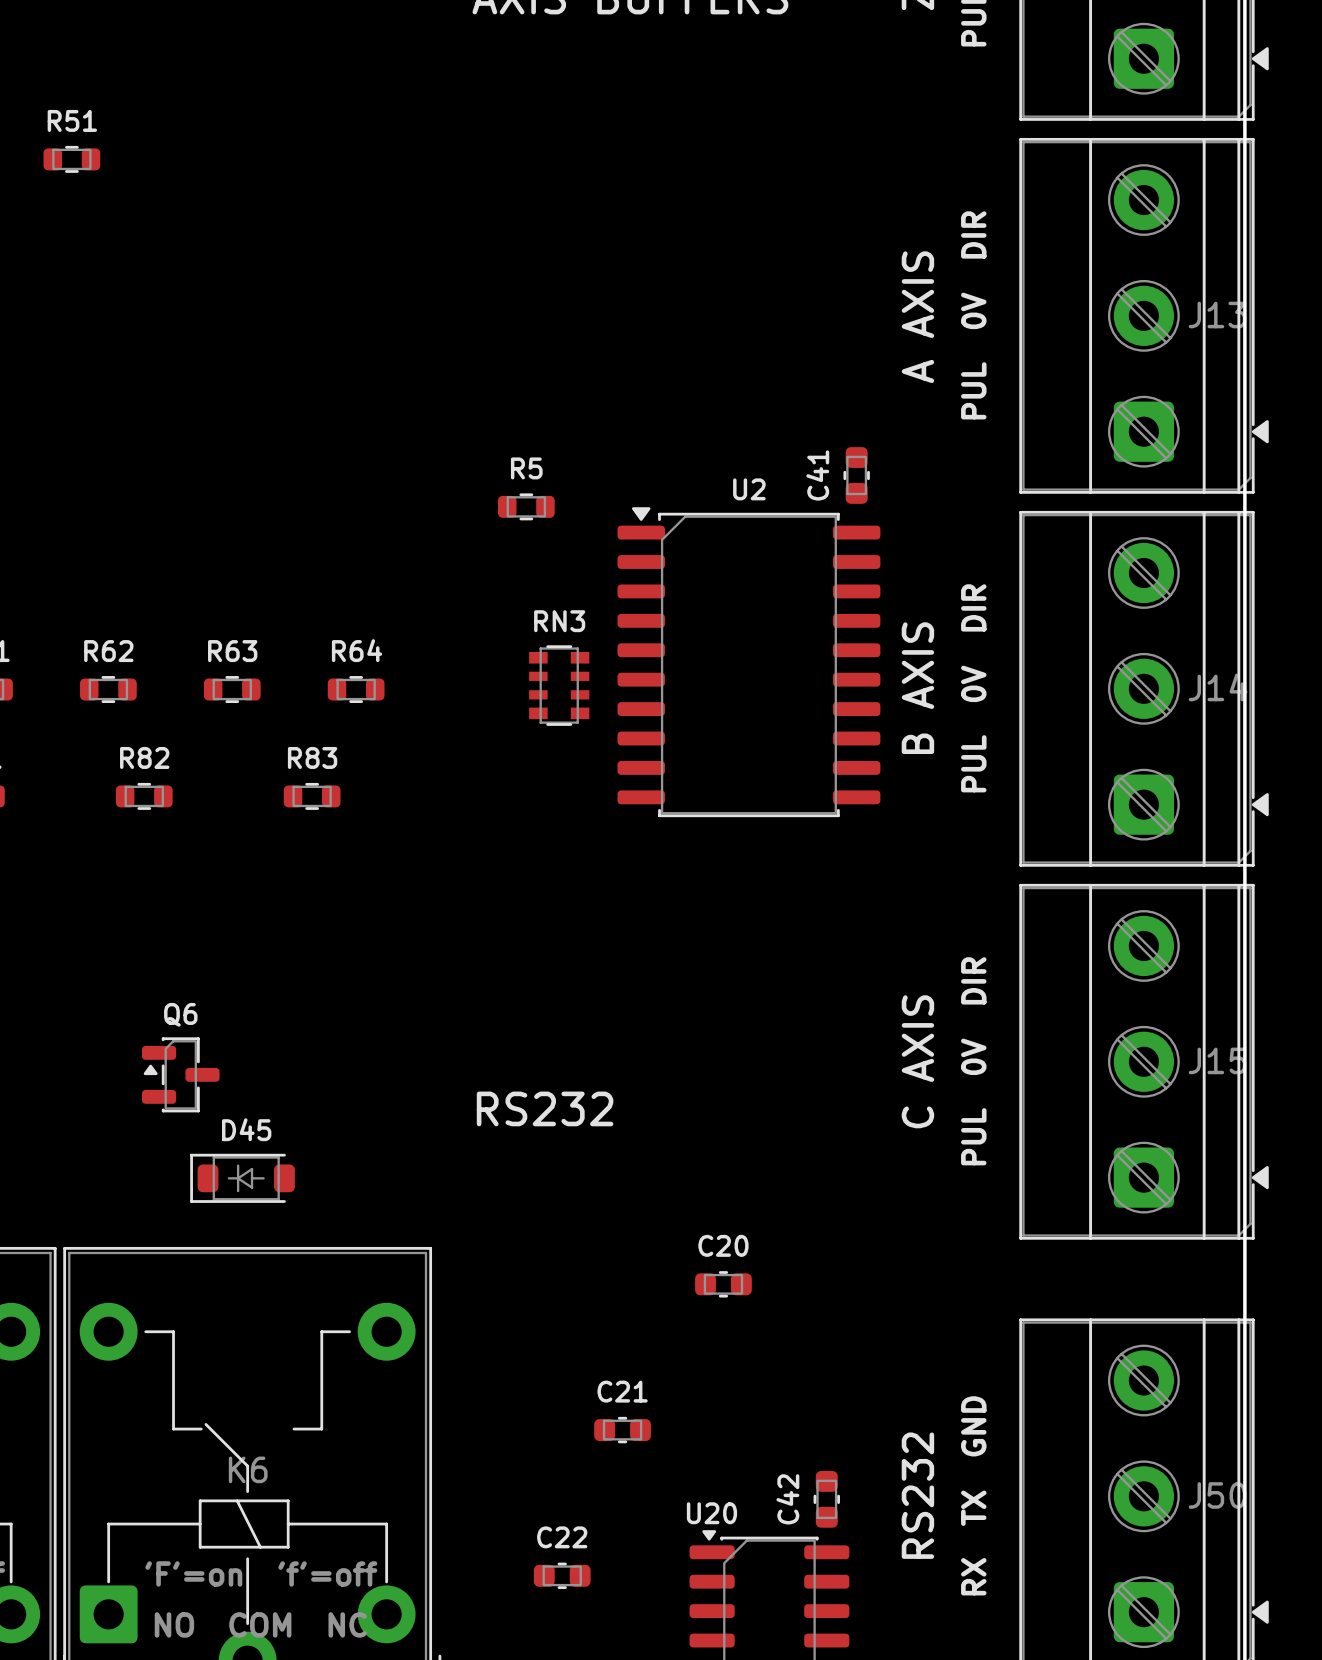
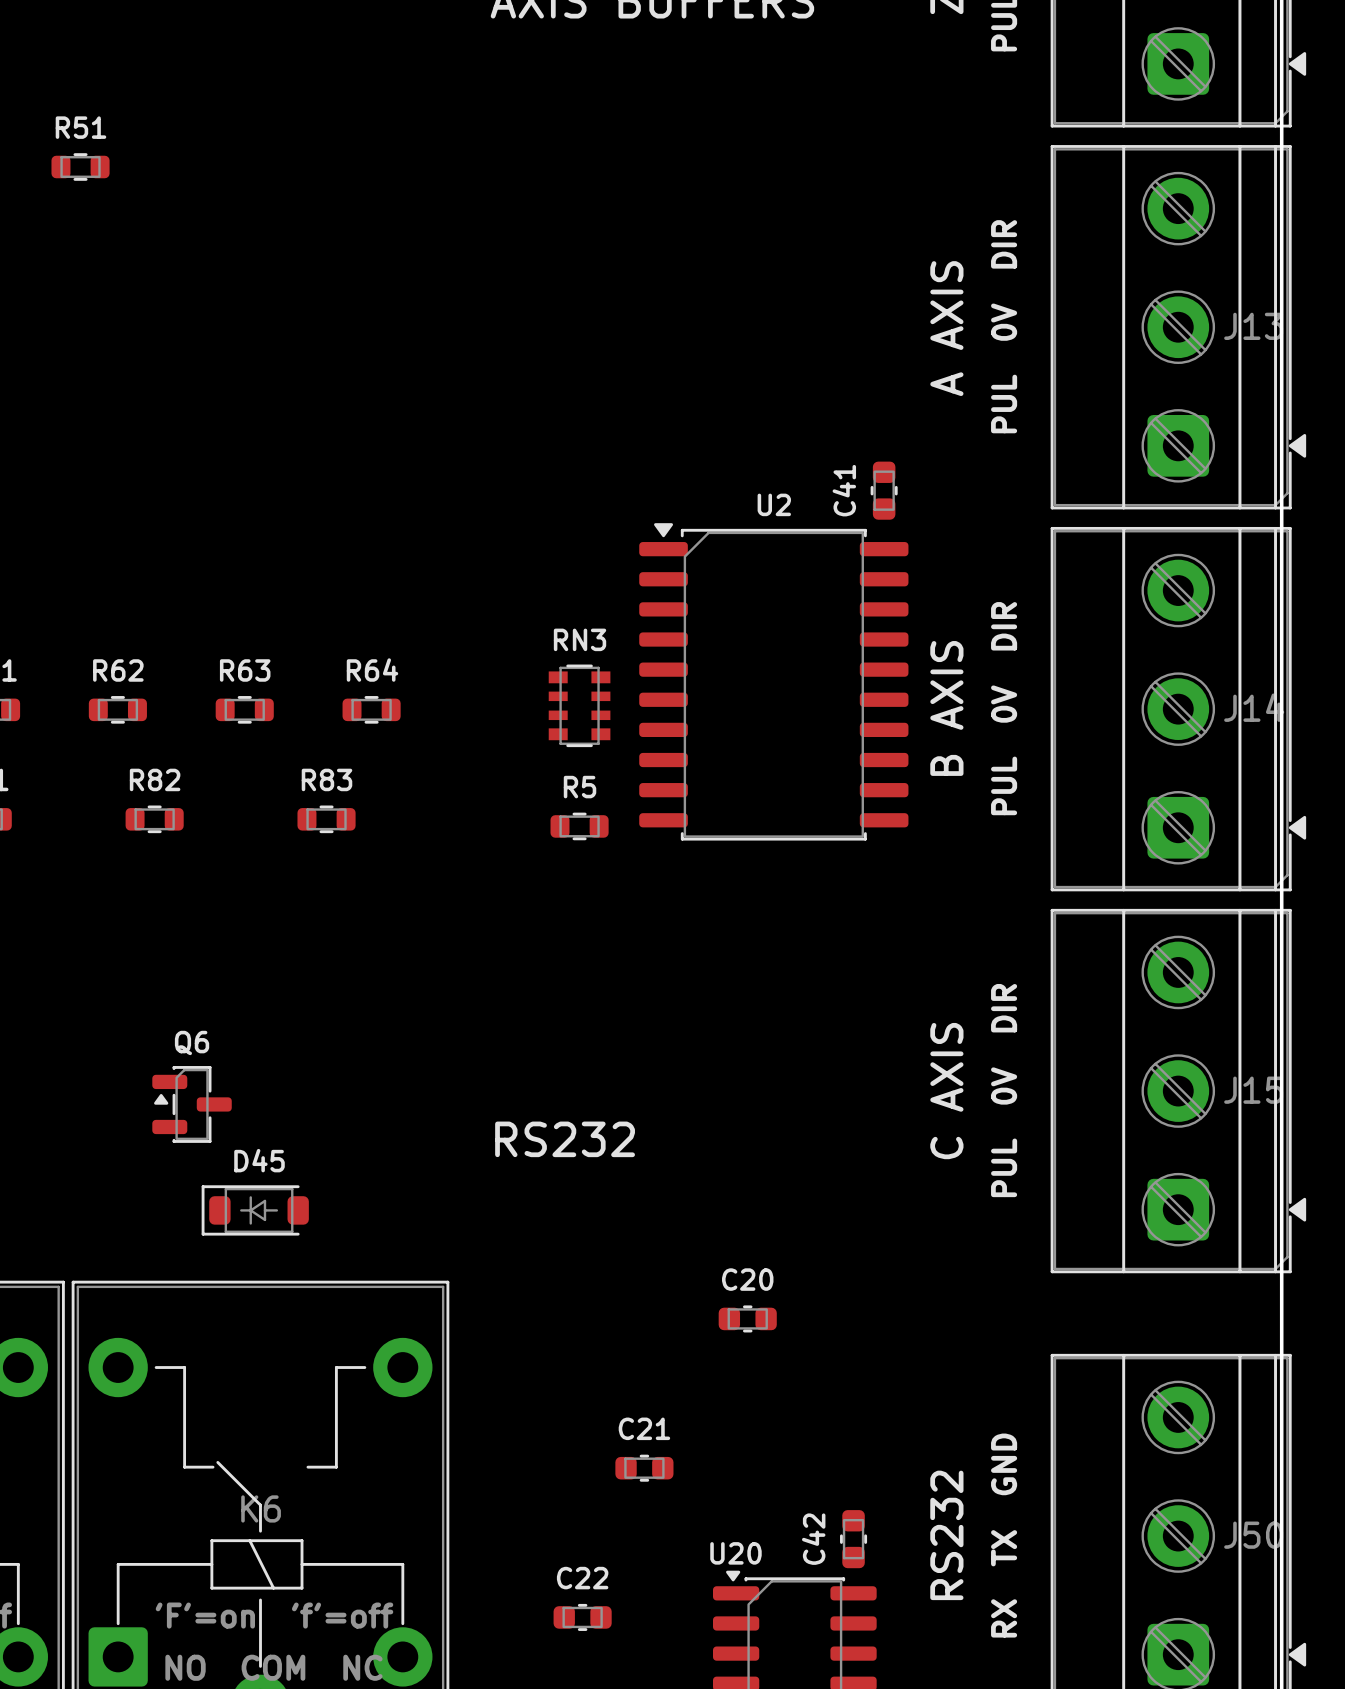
R5 position: (526, 506) -> (579, 826)

